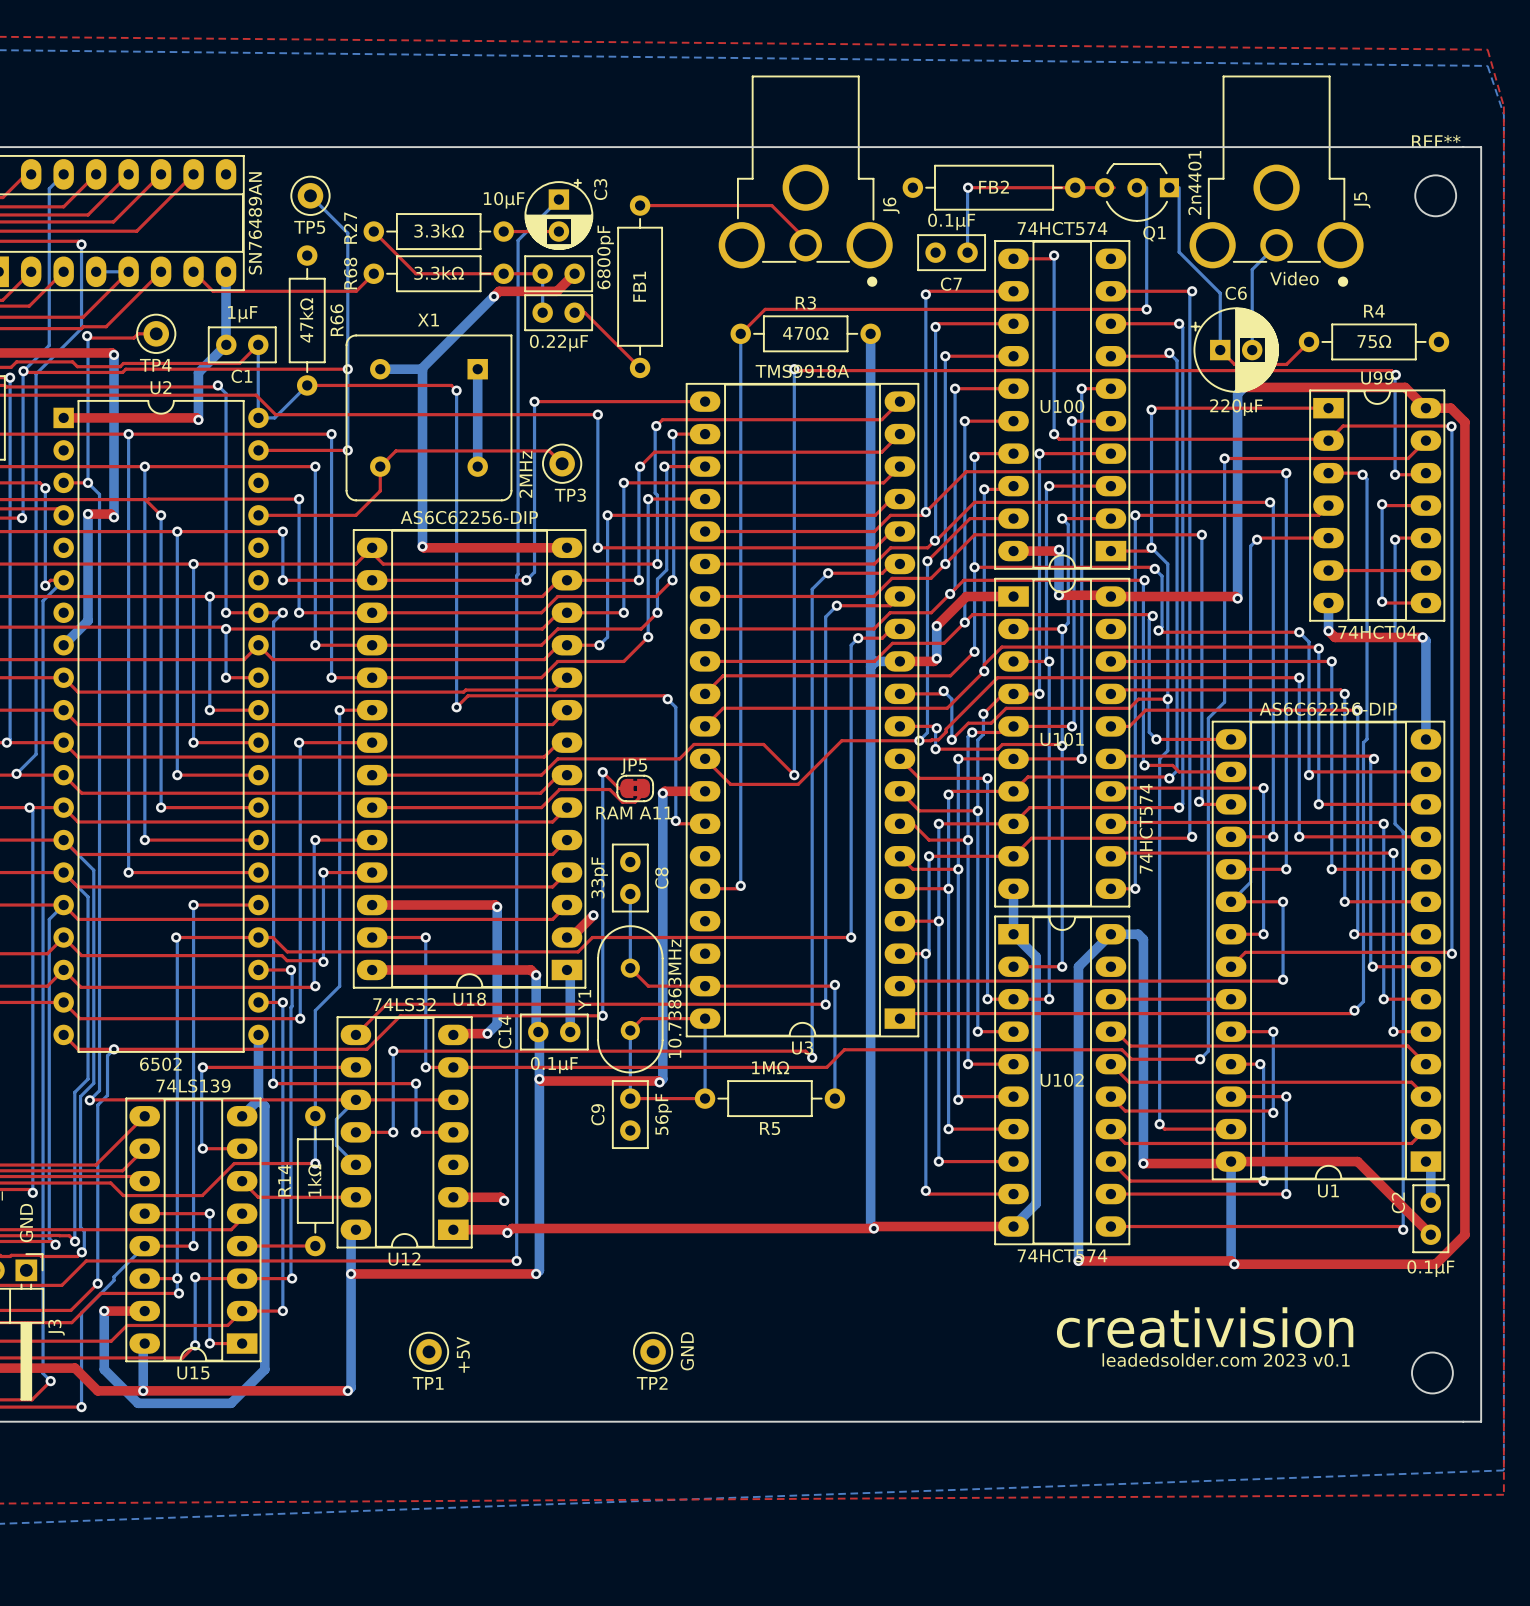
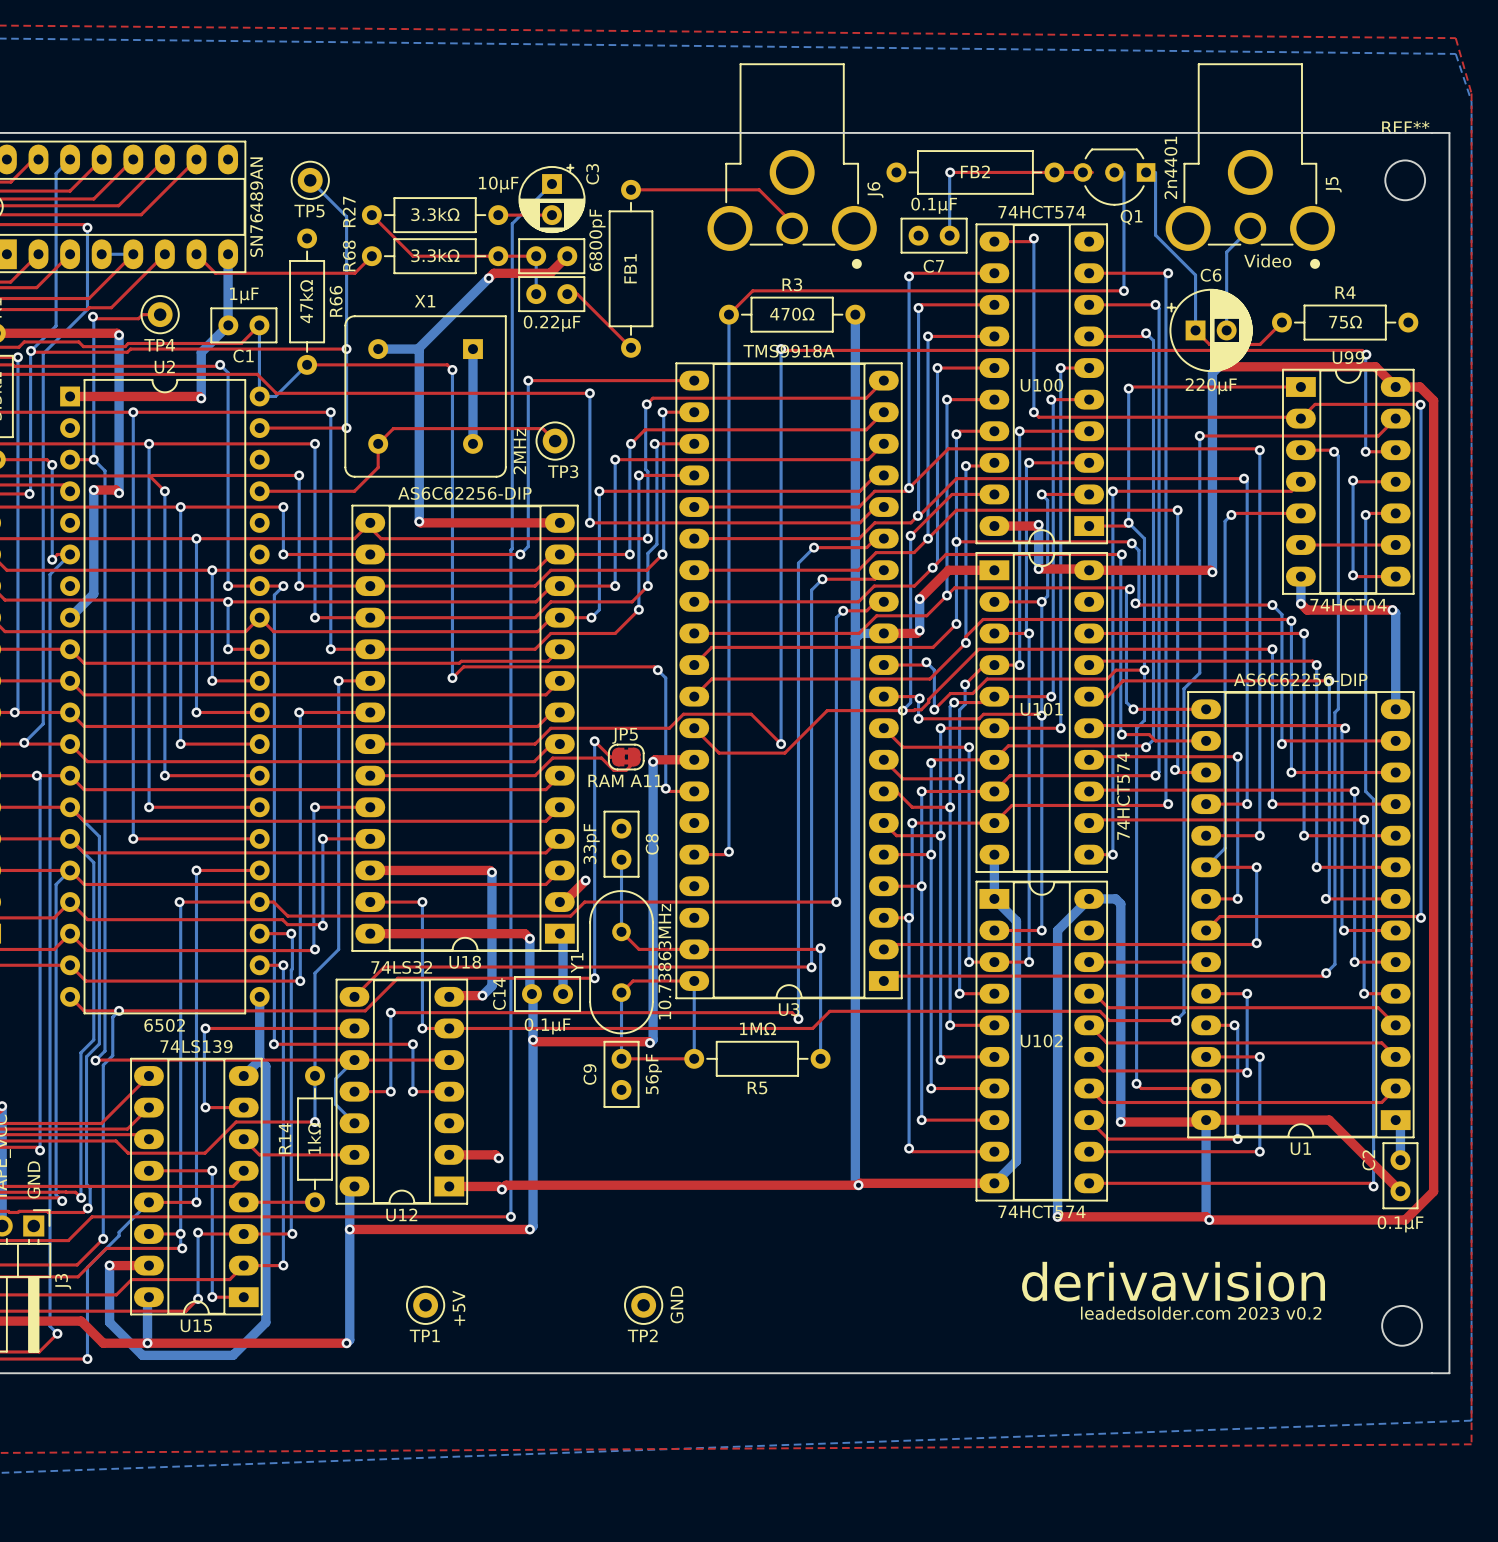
text: creativision (1205, 1327) -> derivavision (1173, 1281)
text: leadedsolder.com 2023 v0.1 (1226, 1360) -> leadedsolder.com 2023 v0.2 (1201, 1313)

